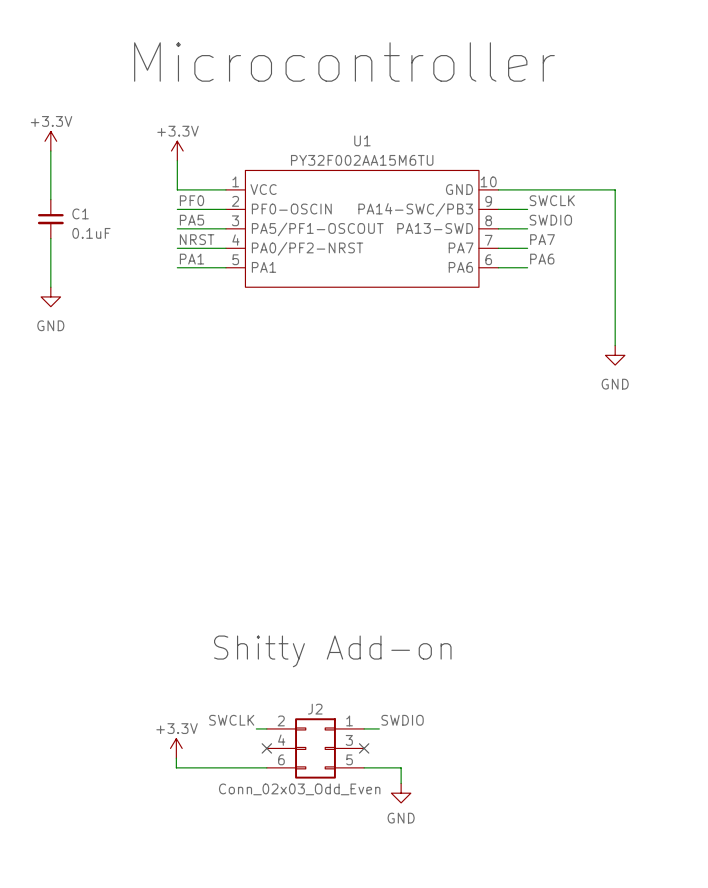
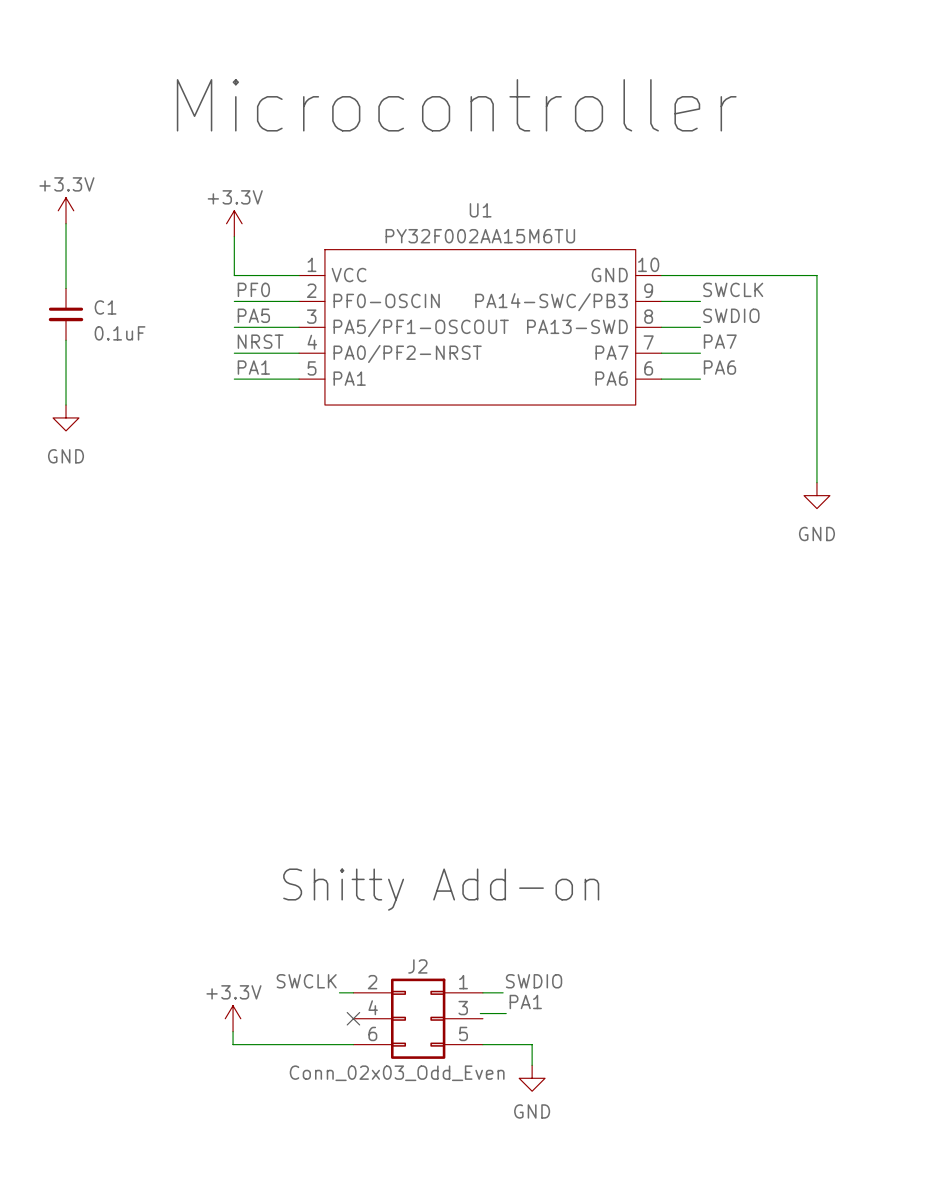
label: none -> PA1 (525, 1002)
wire: none -> (480, 1013) (506, 1013)
no-connect mark: (364, 748) -> none

